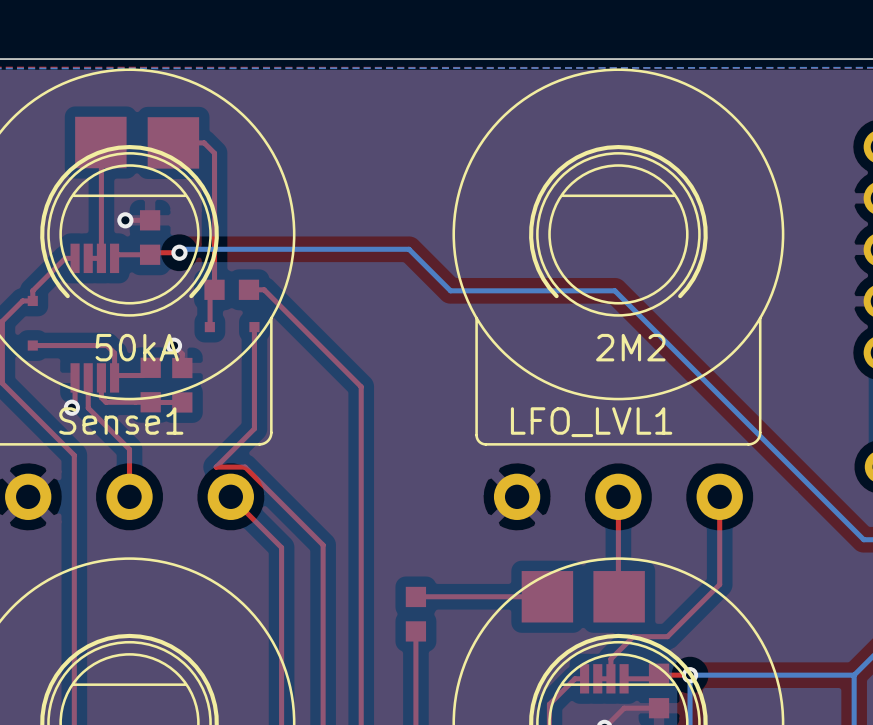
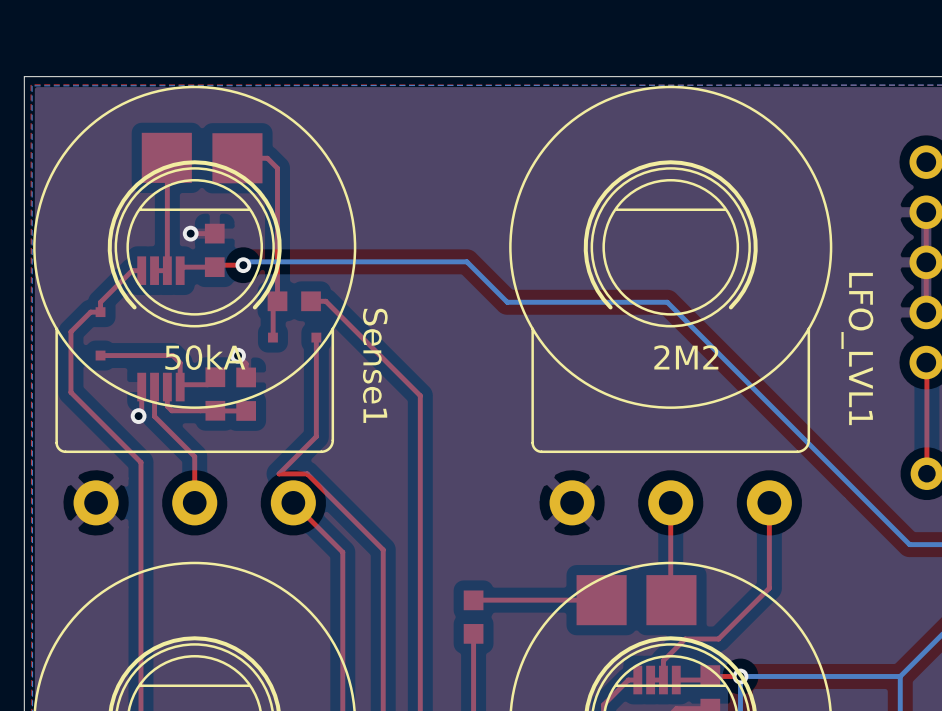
Sense1 name rotation: 0° (121, 421) -> 90° clockwise (375, 365)
Sense1 name position: Sense1 (121, 421) -> Sense1 (375, 365)
LFO_LVL1 name rotation: 0° (591, 422) -> 90° clockwise (857, 348)
LFO_LVL1 name position: LFO_LVL1 (591, 422) -> LFO_LVL1 (857, 348)

